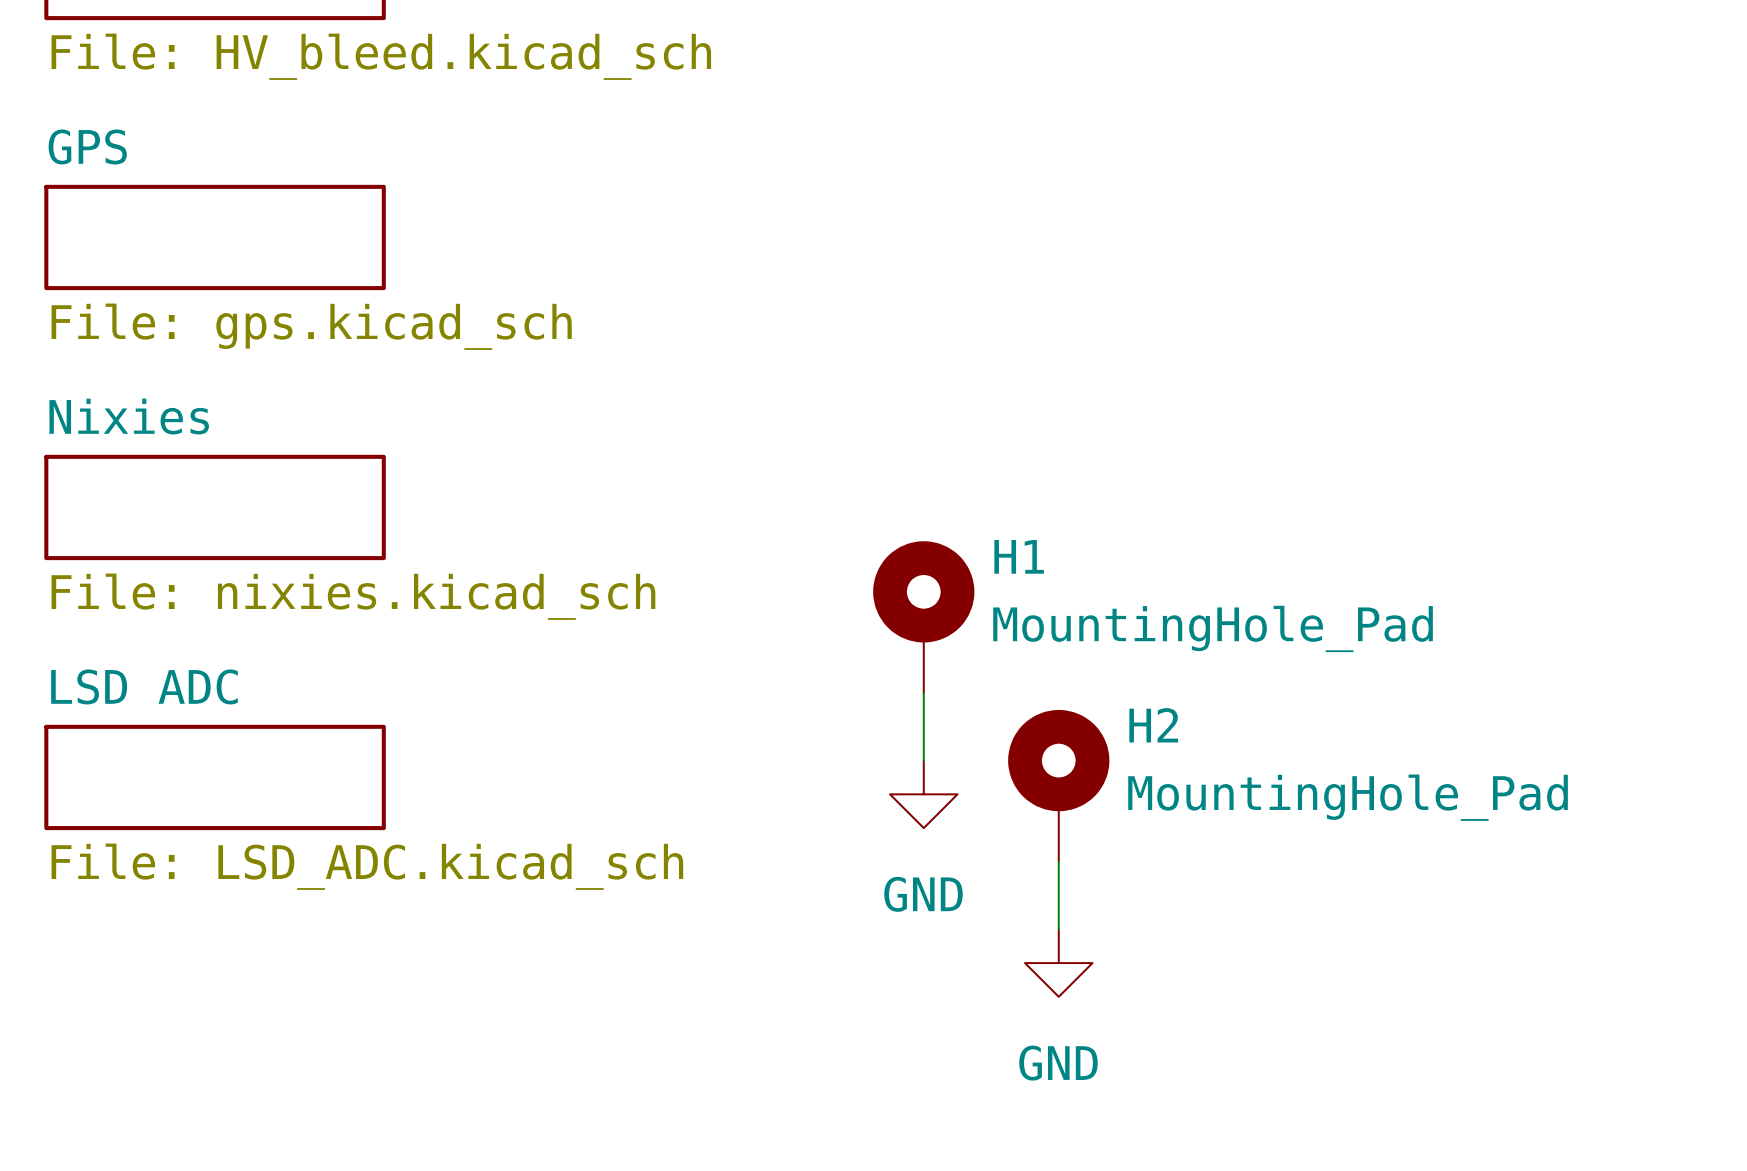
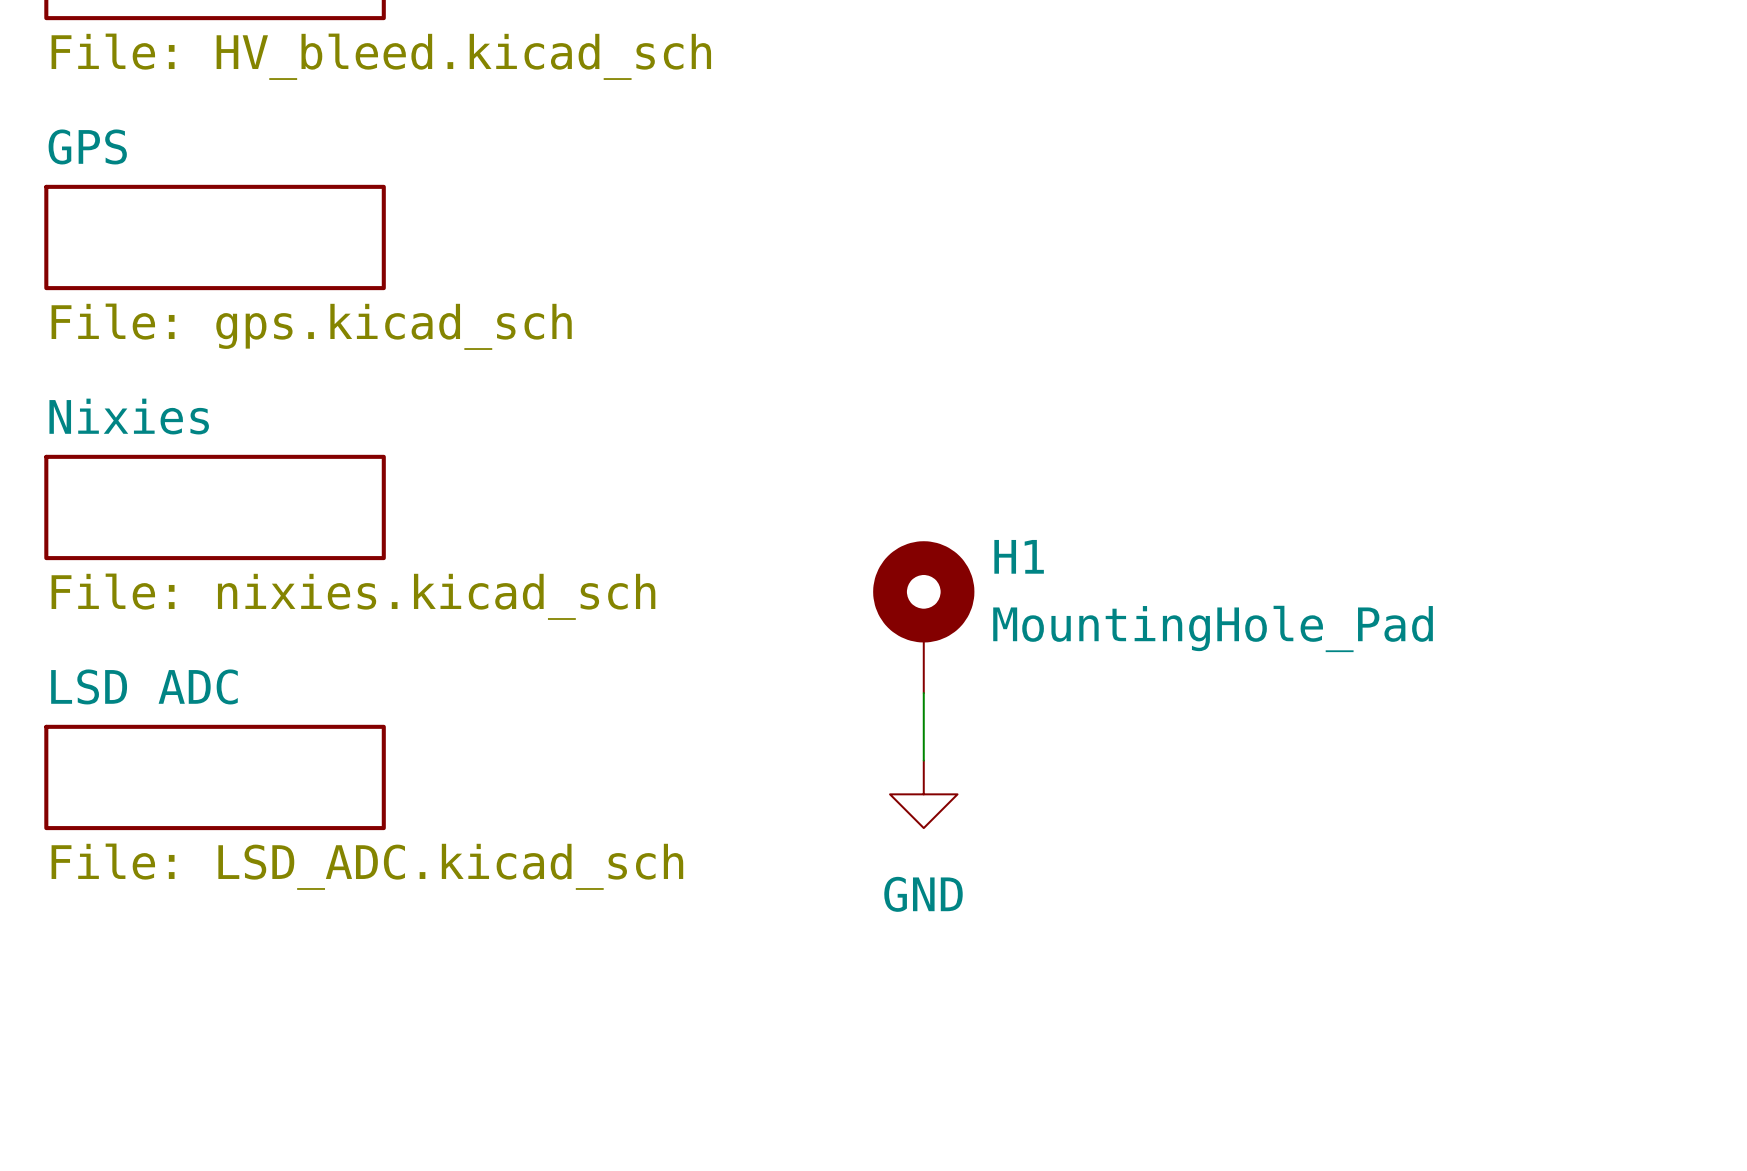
H2: MountingHole_Pad (1058, 785) -> none
wire: (1058, 861) (1058, 929) -> none
power symbol: GND (1058, 963) -> none

